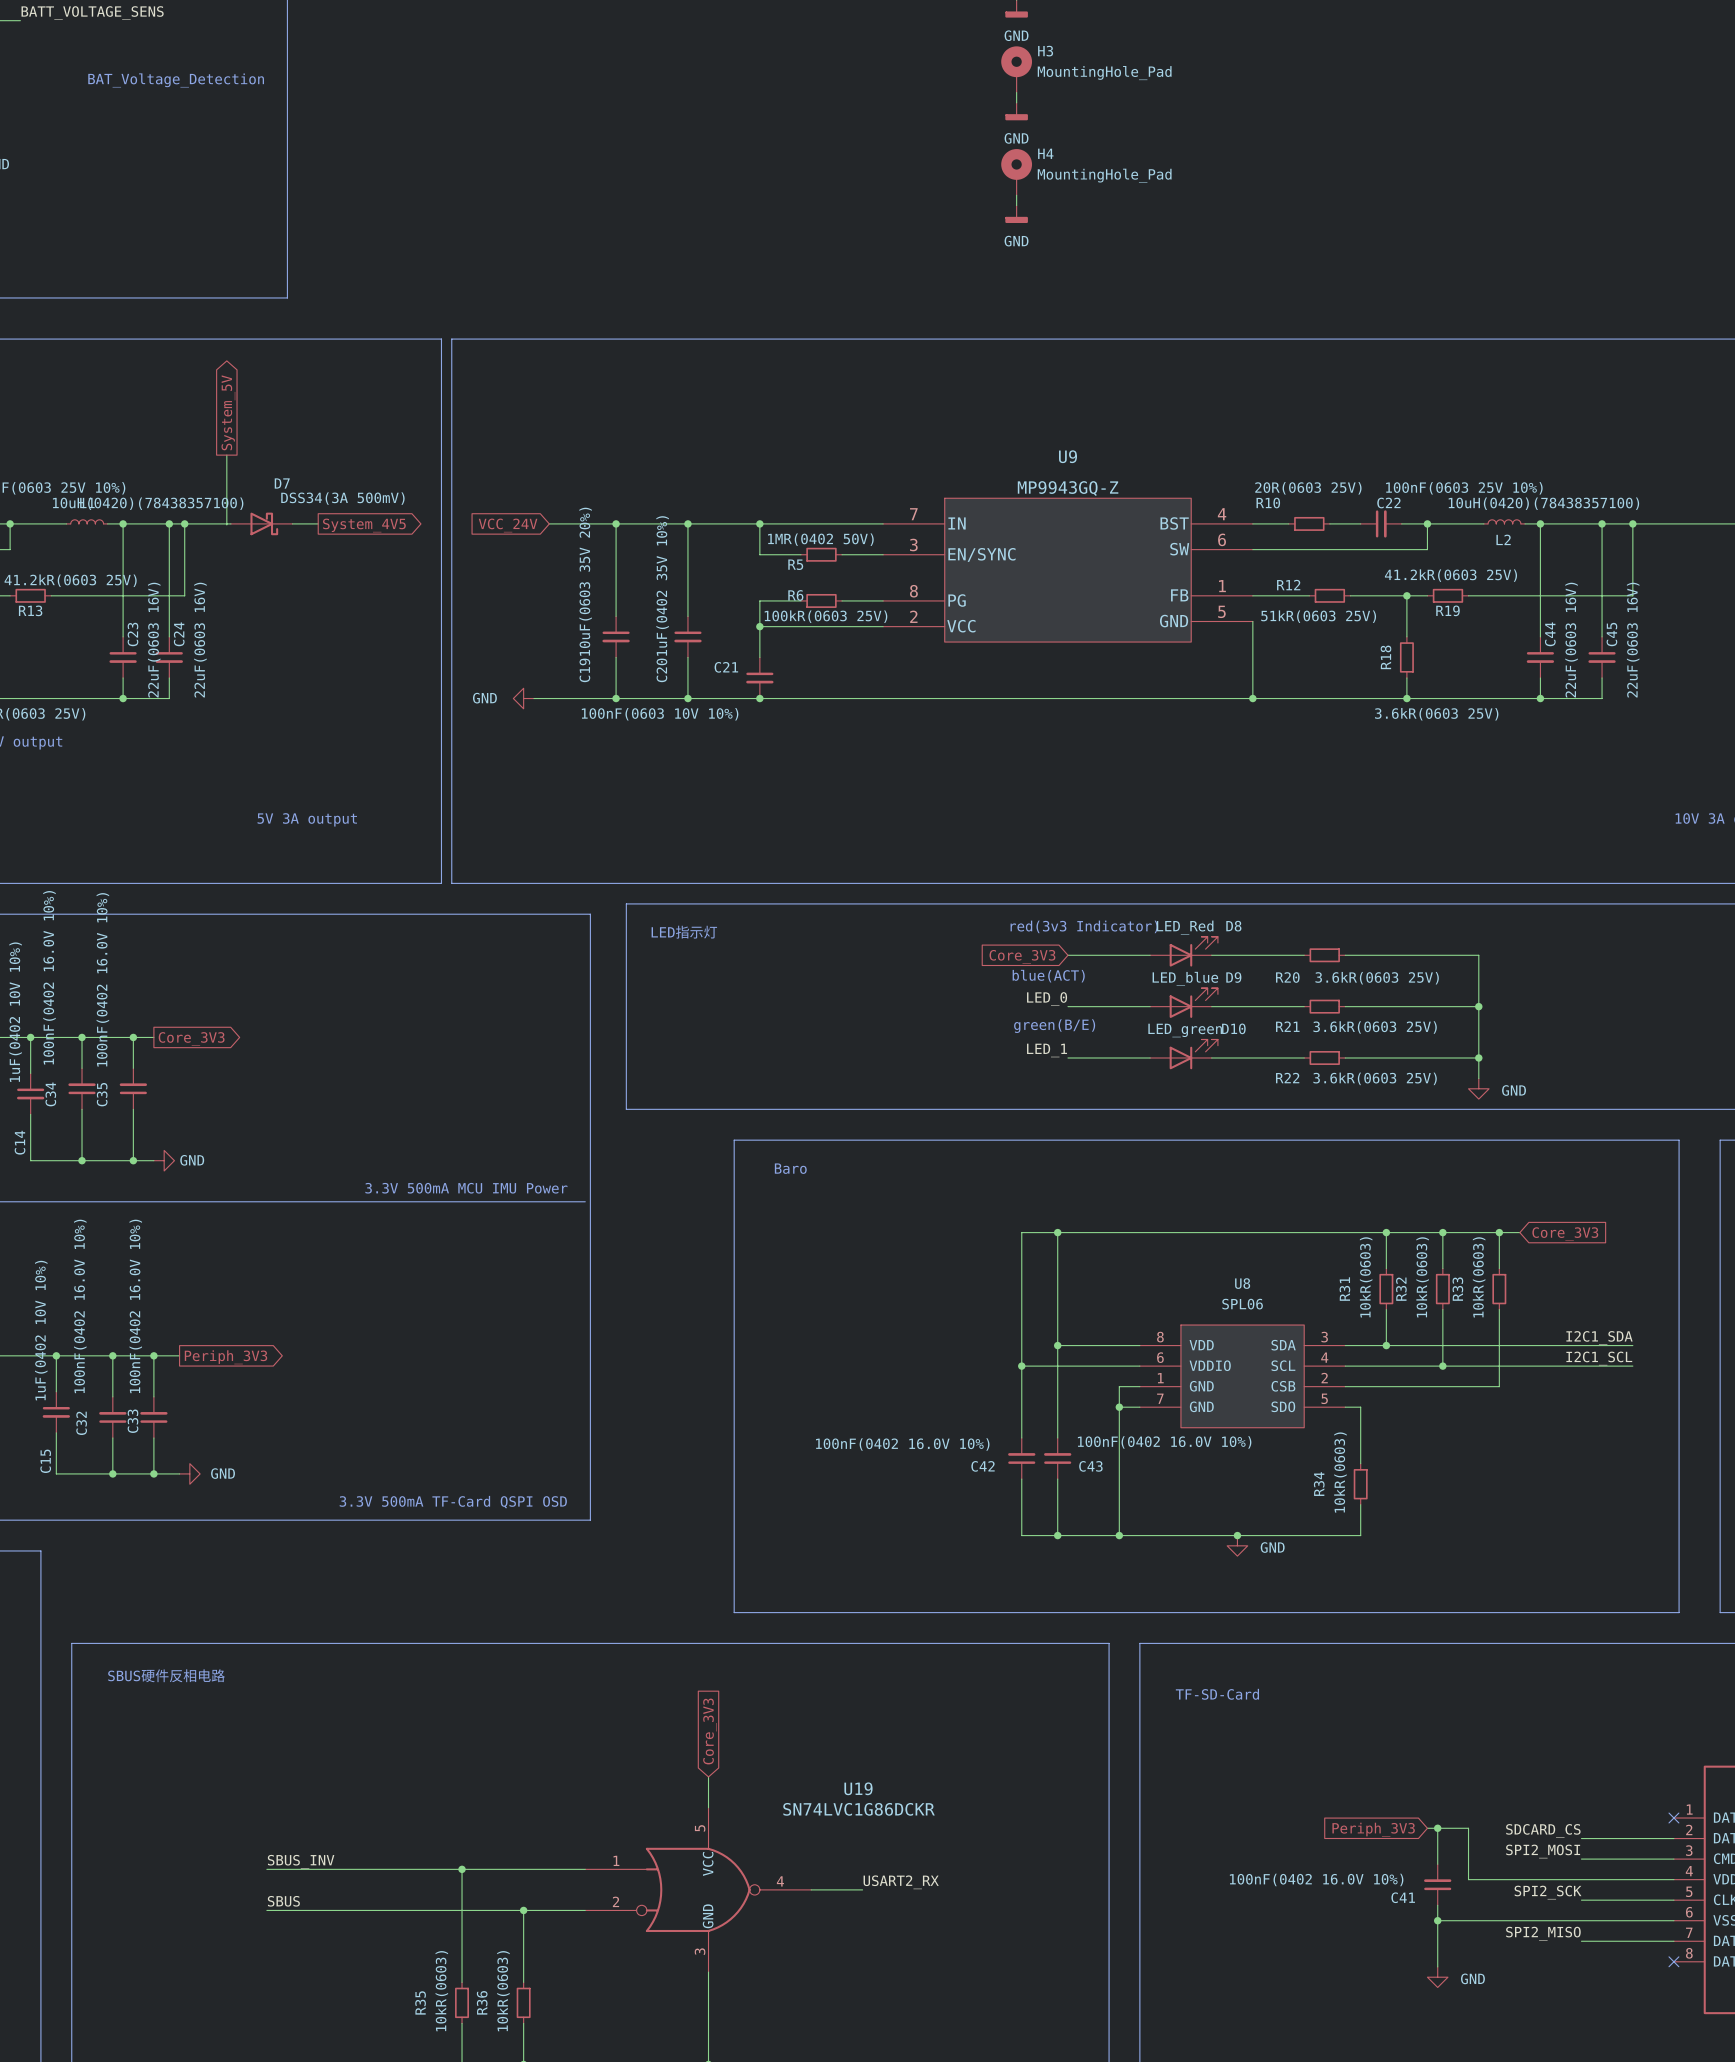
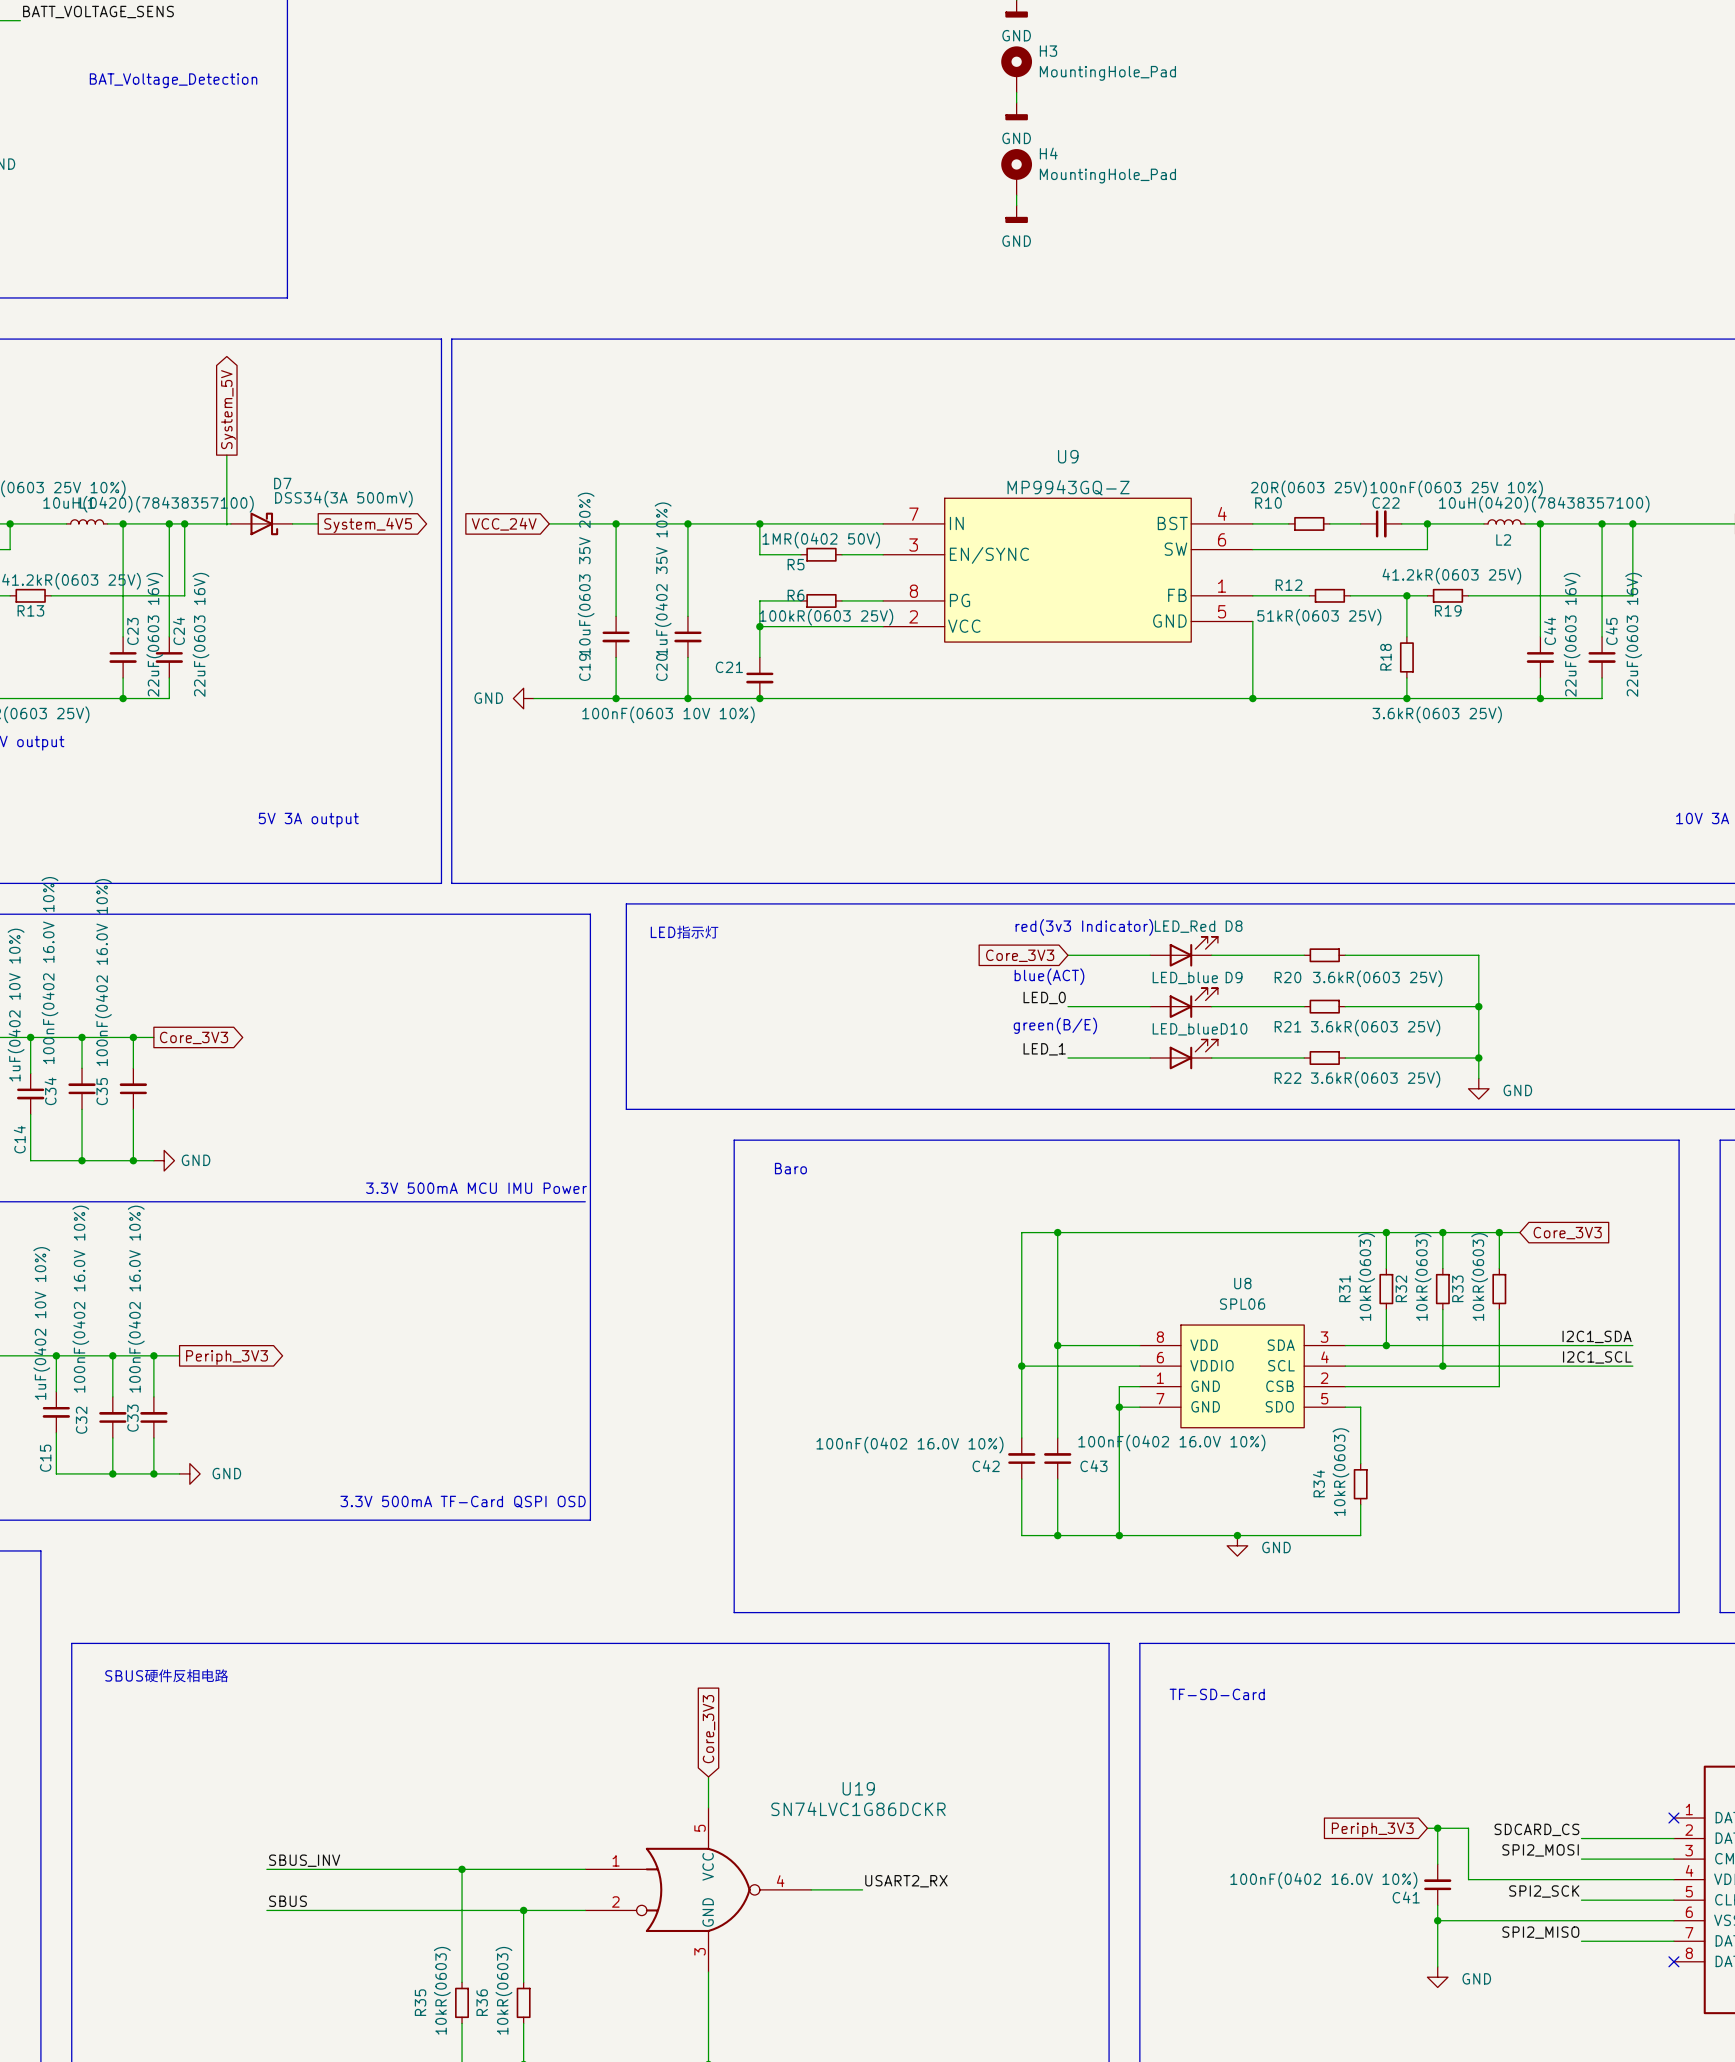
D10 value: LED_green (1185, 1030) -> LED_blue (1185, 1029)

